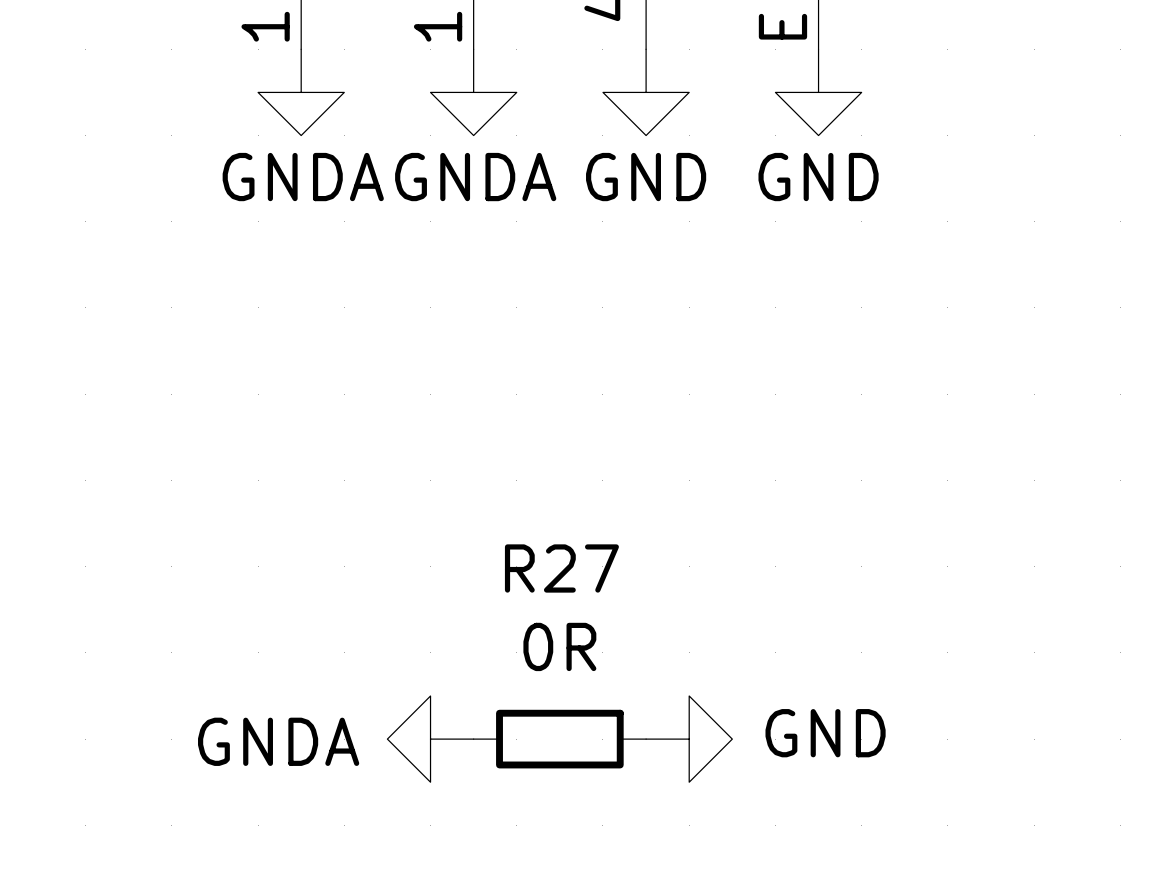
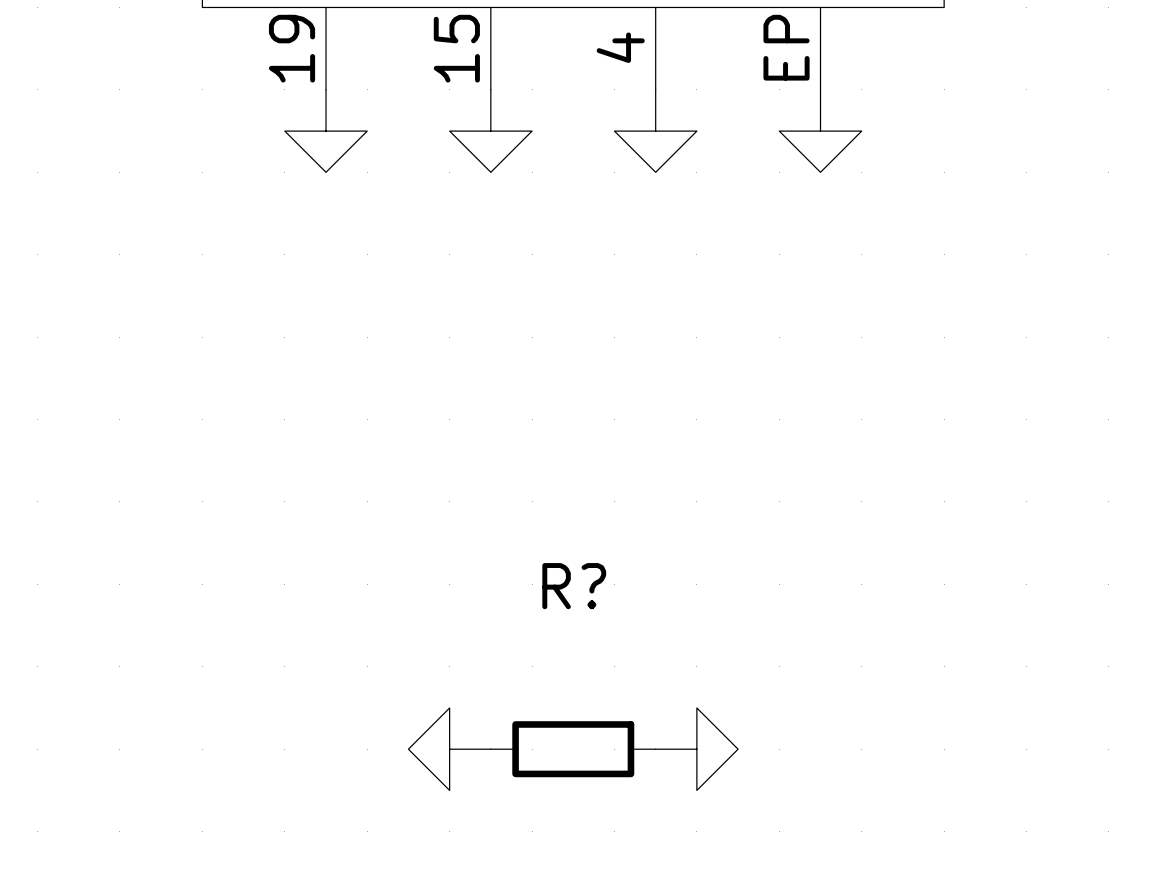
power symbol text: GNDA (303, 177) -> none
power symbol text: GNDA (475, 177) -> none
power symbol text: GND (646, 177) -> none
power symbol text: GND (818, 177) -> none
R27 name: R27 (561, 568) -> R? (574, 586)
R27 value: 0R (559, 646) -> none
power symbol text: GND (825, 733) -> none
power symbol text: GNDA (278, 741) -> none

